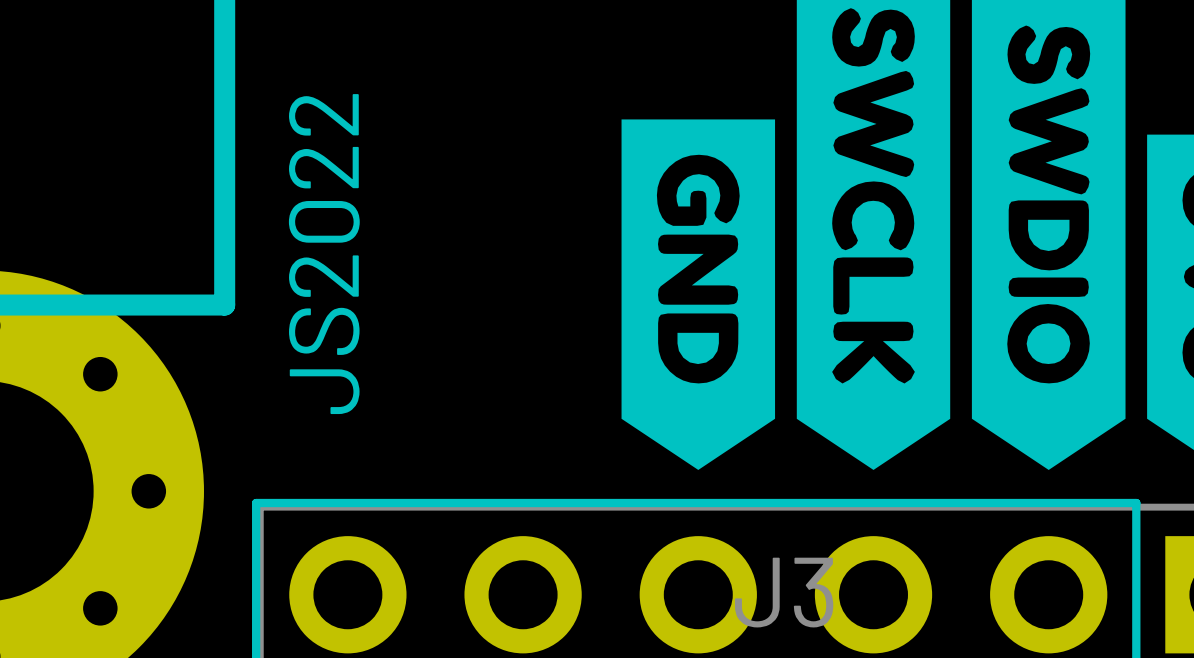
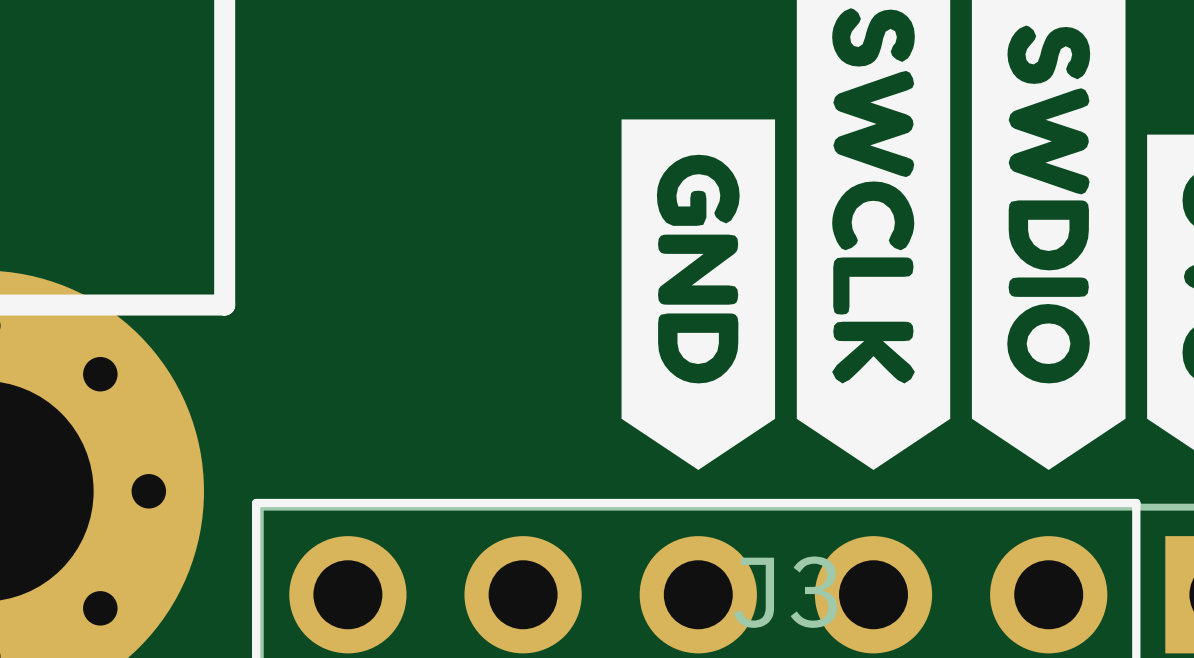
text: JS2022 (324, 254) -> none

